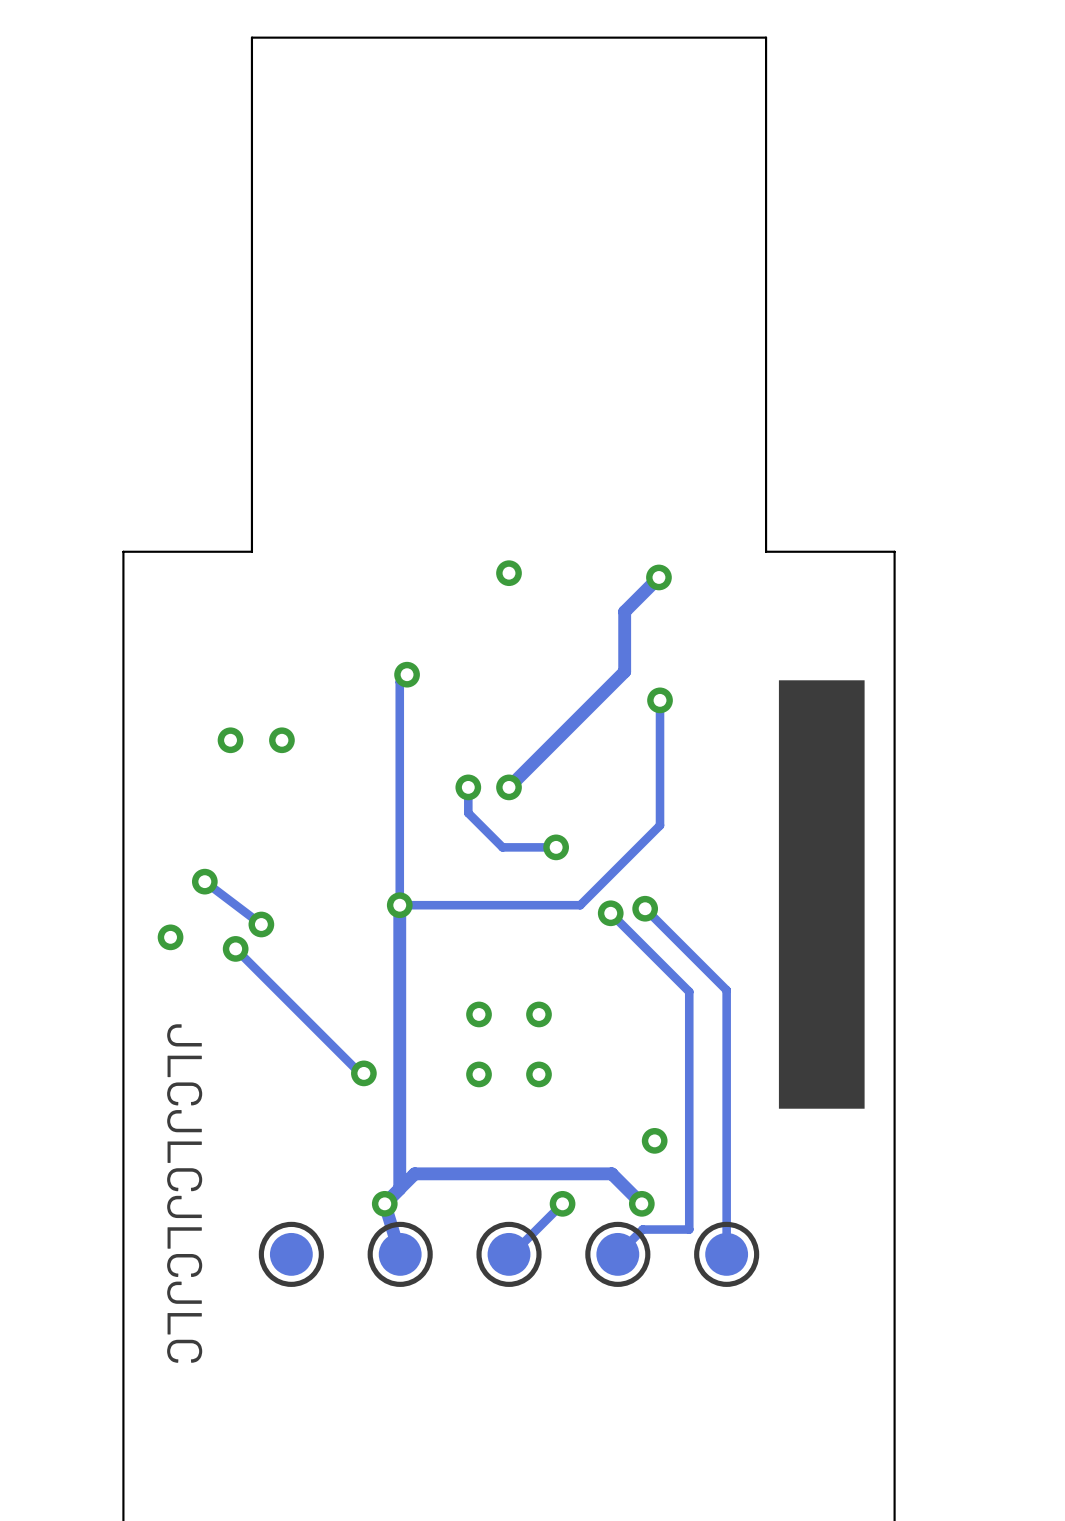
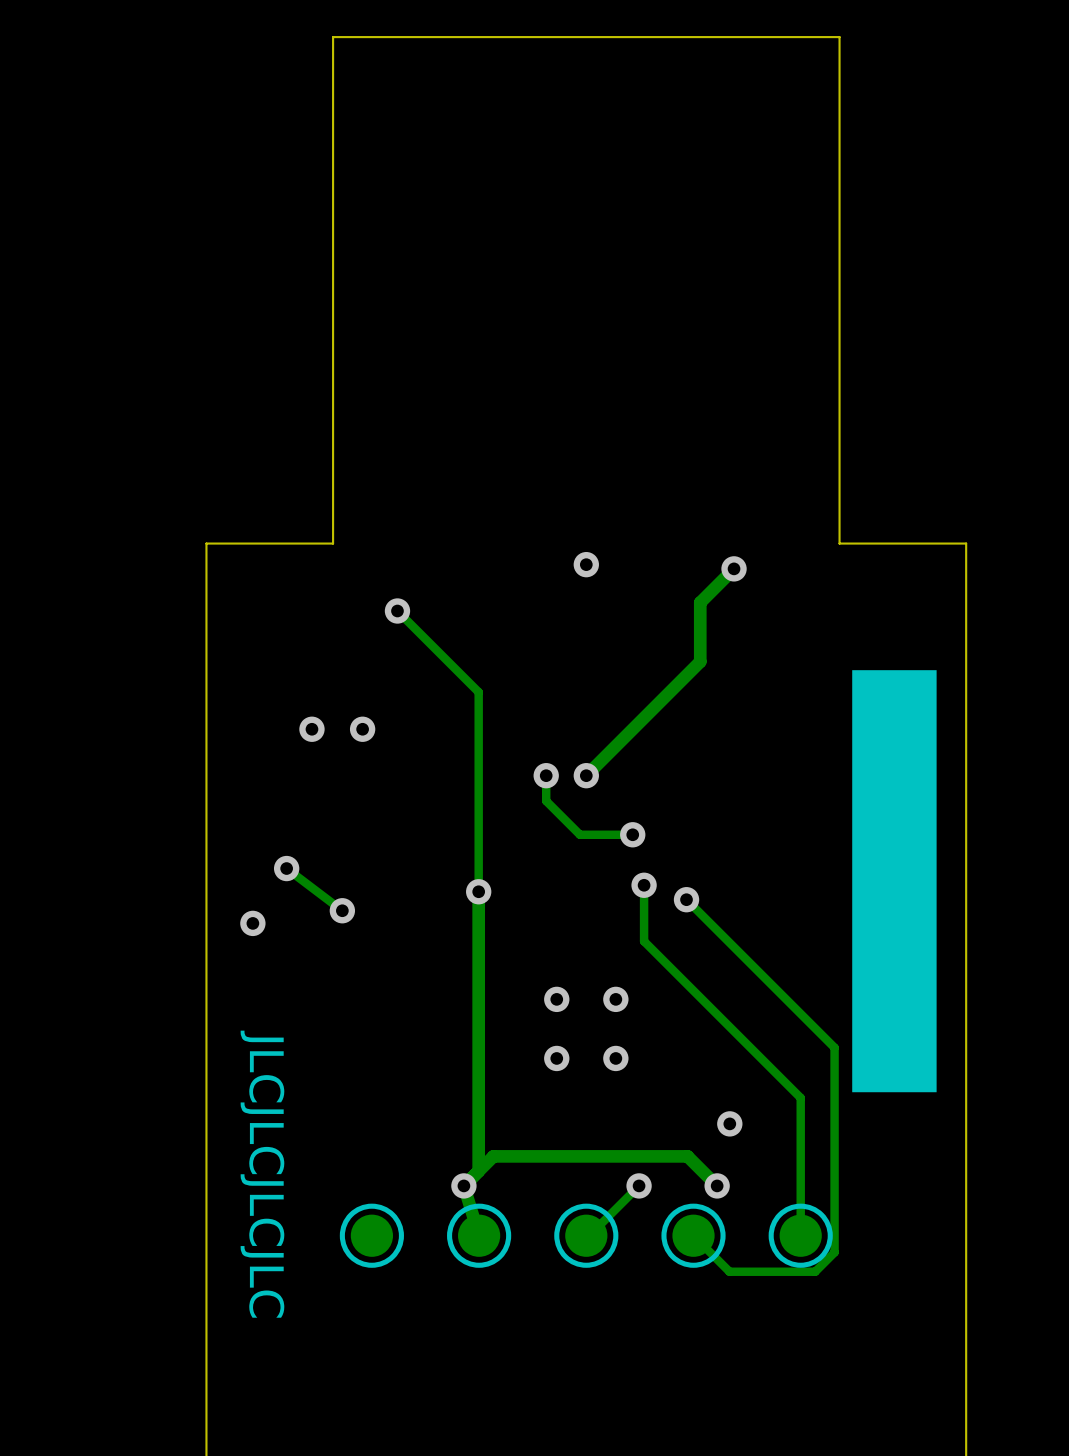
track: (407, 674) (399, 682) (399, 702) -> (397, 611) (478, 692)
via position: (407, 674) -> (397, 611)
track: (660, 700) (660, 825) (580, 905) (399, 905) -> none
via: (660, 700) -> none
track: (645, 908) (726, 990) (726, 1114) -> (644, 885) (644, 941) (800, 1097)
via position: (645, 908) -> (644, 885)
track: (235, 948) (360, 1073) (363, 1073) -> none
via: (235, 948) -> none
track: (689, 991) (689, 1229) (642, 1229) (617, 1254) -> (763, 977) (834, 1047) (834, 1252) (815, 1271) (729, 1271) (693, 1235)
via: (363, 1073) -> none

